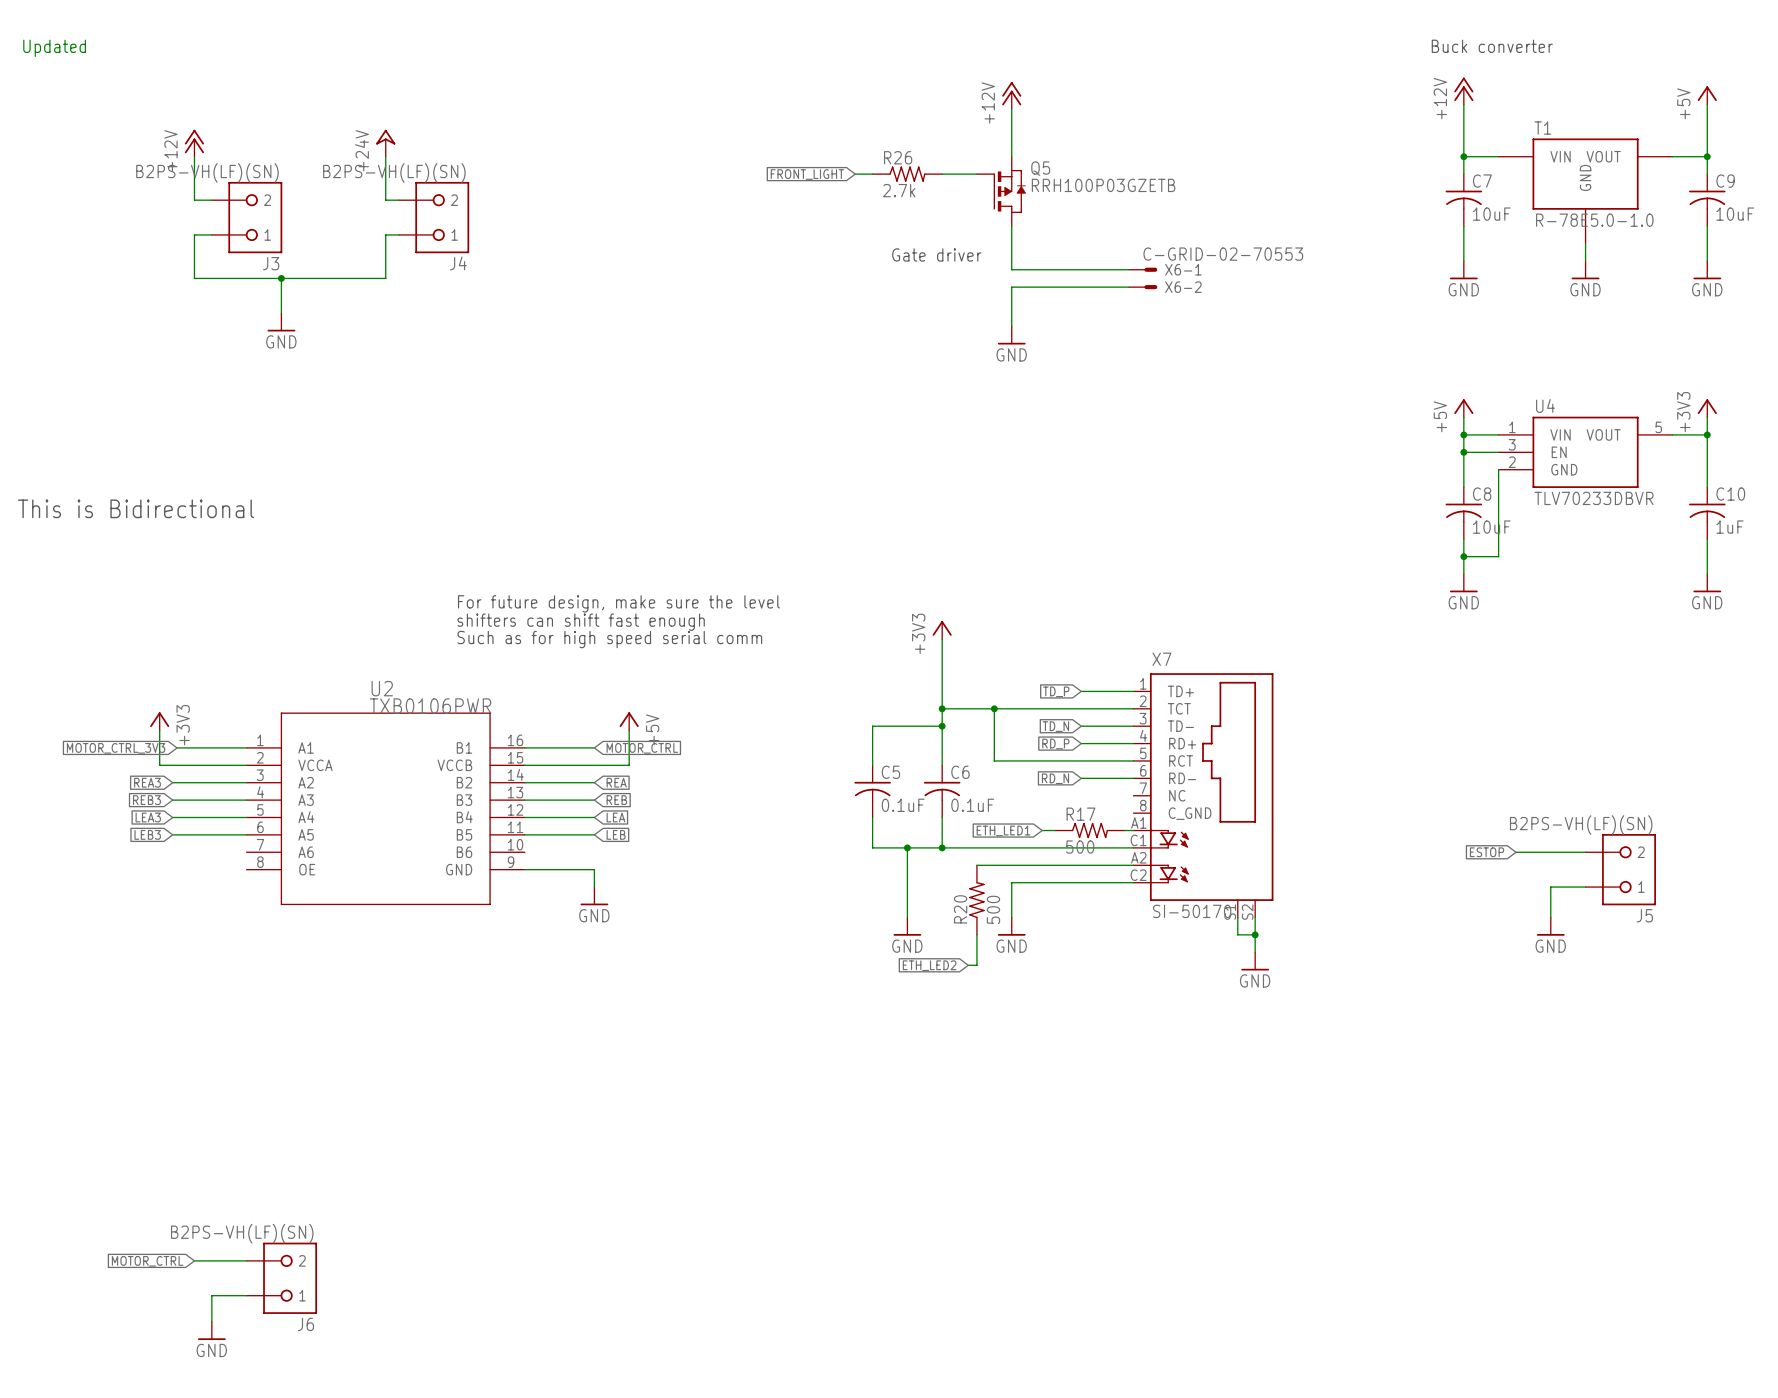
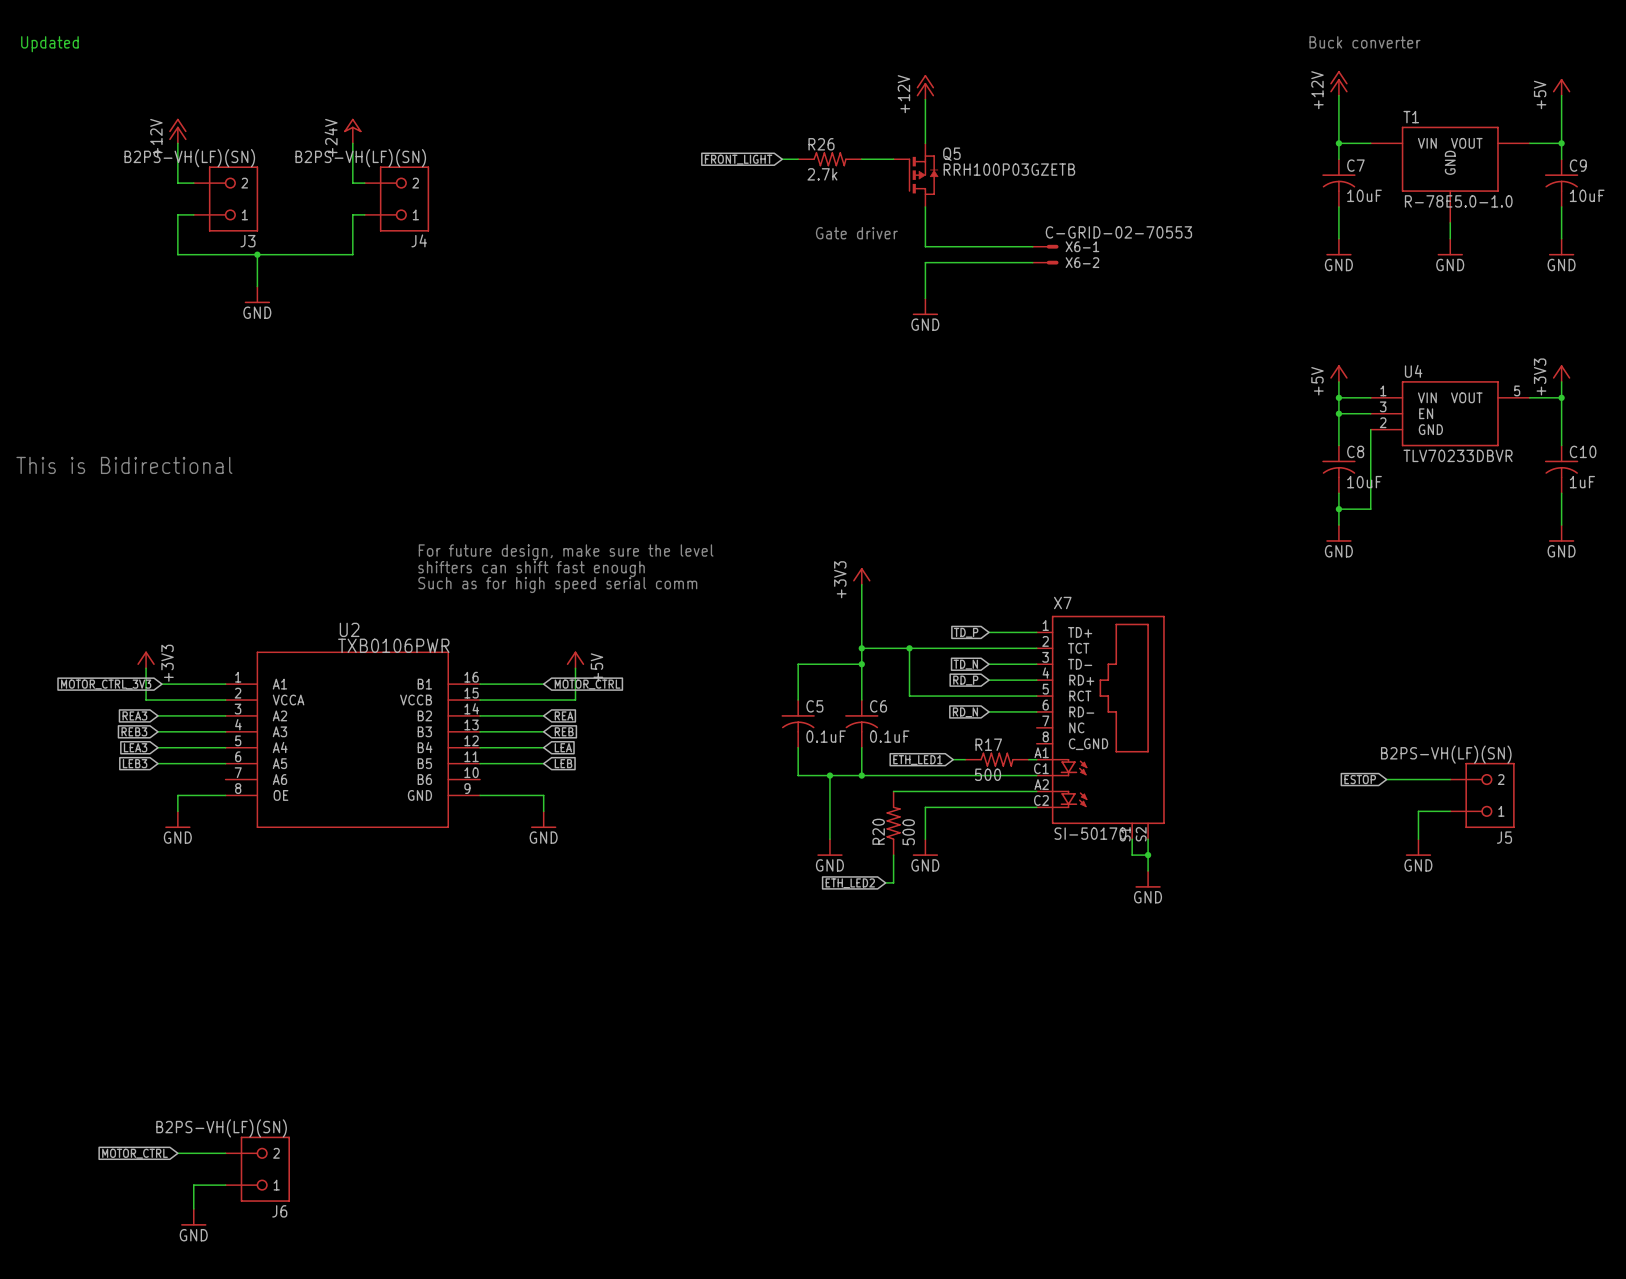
wire: none -> (225, 795) (177, 795) (177, 811)
power symbol: none -> GND (177, 819)

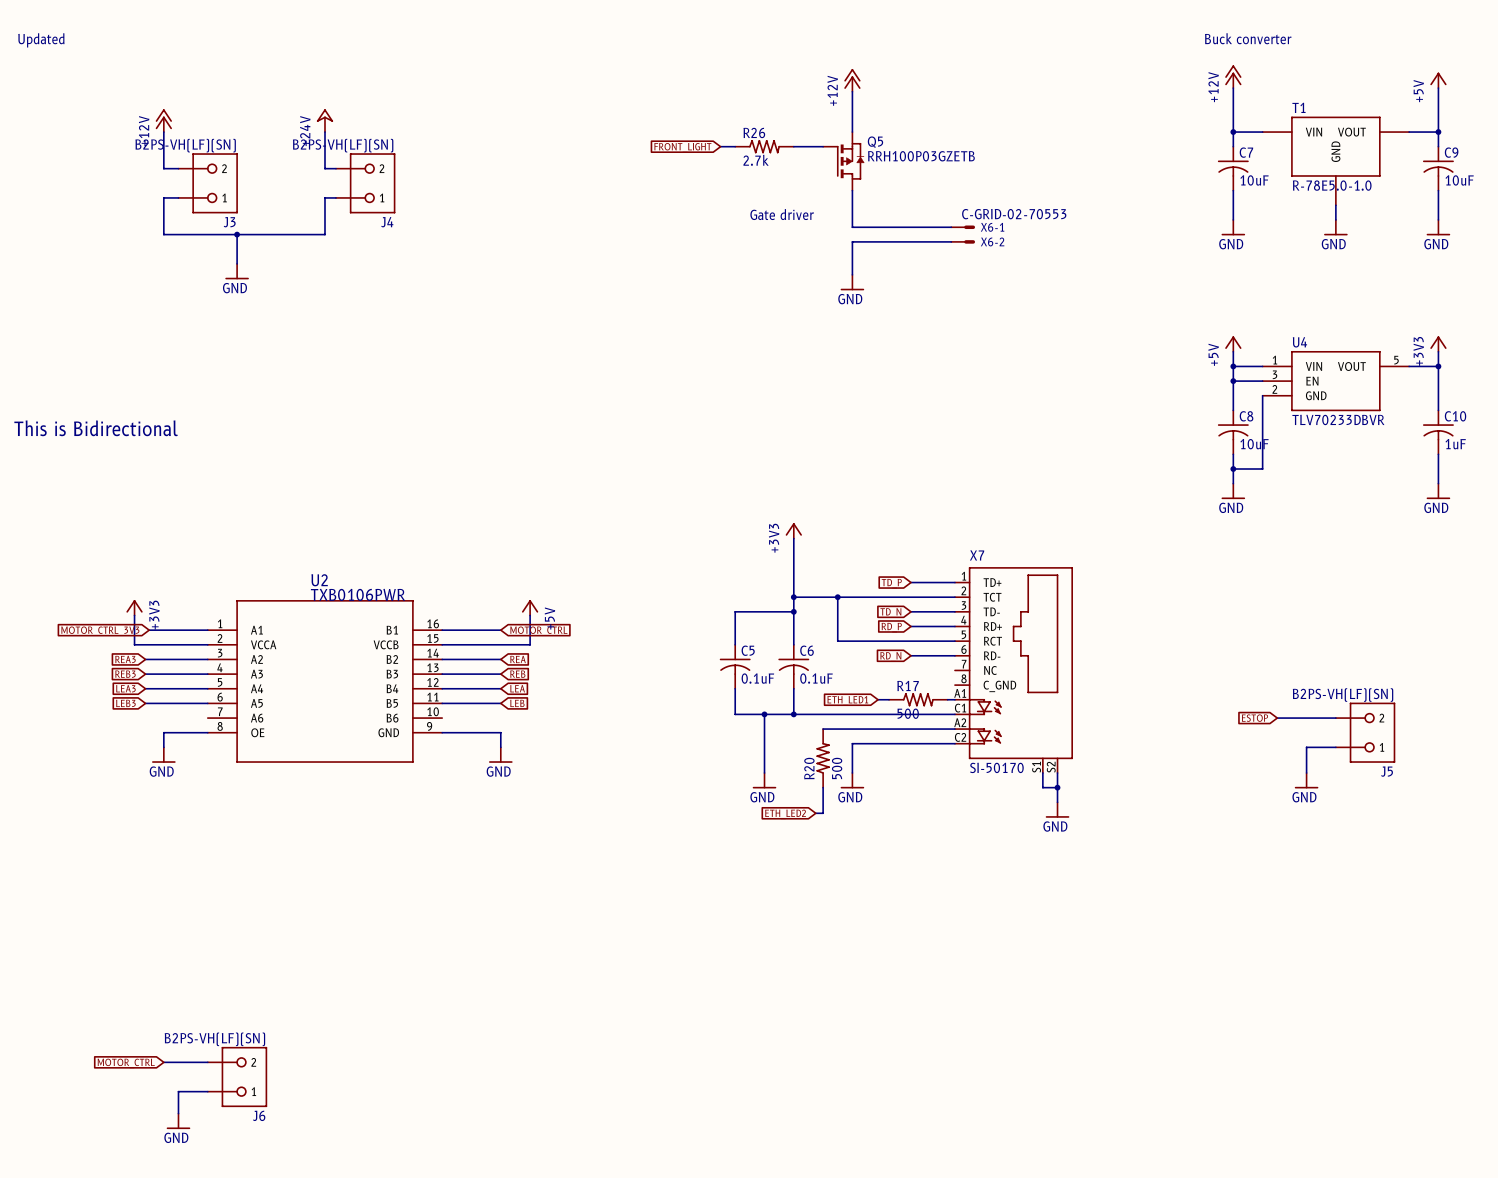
text: For future design, make sure the level (566, 552) -> none
text: shifters can shift fast enough (531, 569) -> none
text: Such as for high speed serial comm (557, 584) -> none

